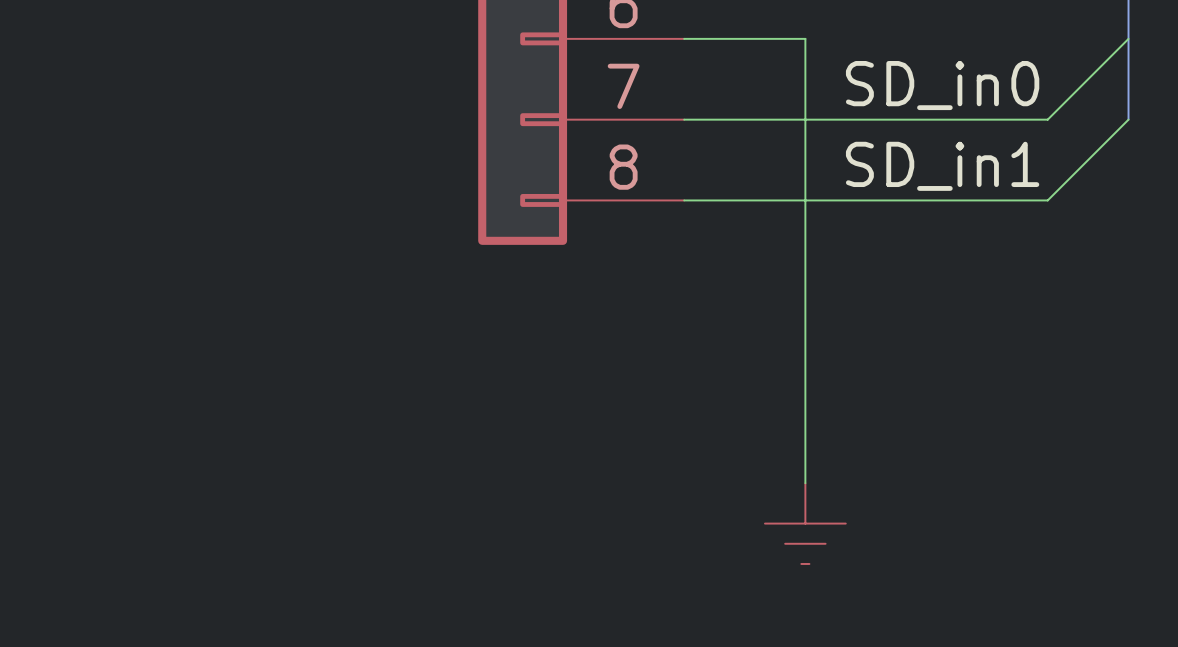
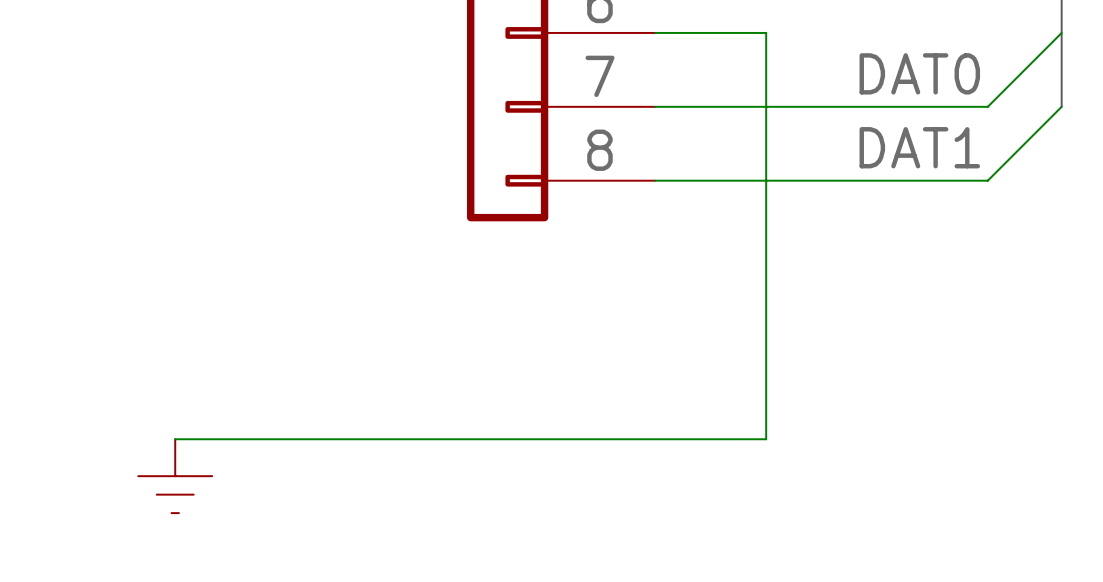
label: SD_in0 (942, 85) -> DAT0 (919, 73)
label: SD_in1 (942, 166) -> DAT1 (919, 147)
wire: none -> (175, 439) (766, 439)
power symbol position: (805, 523) -> (175, 476)

